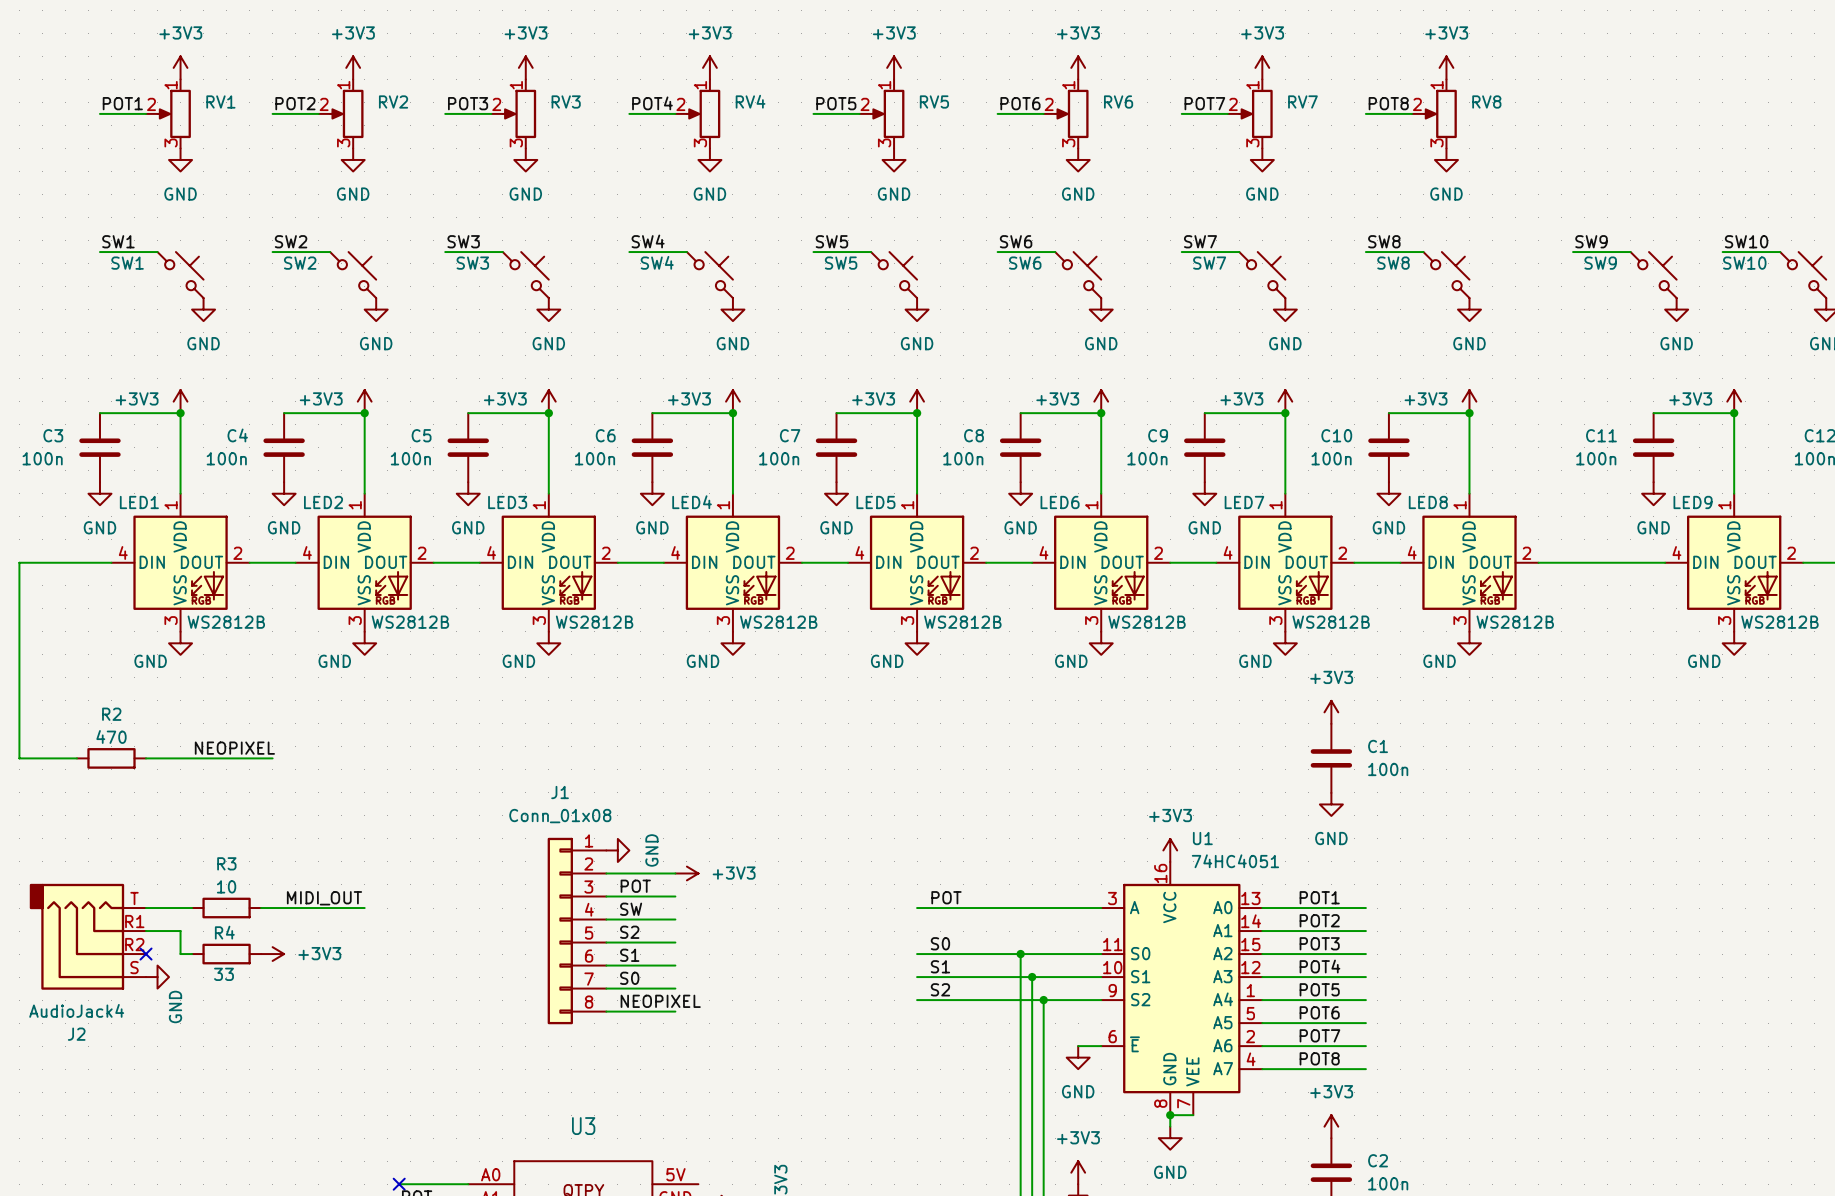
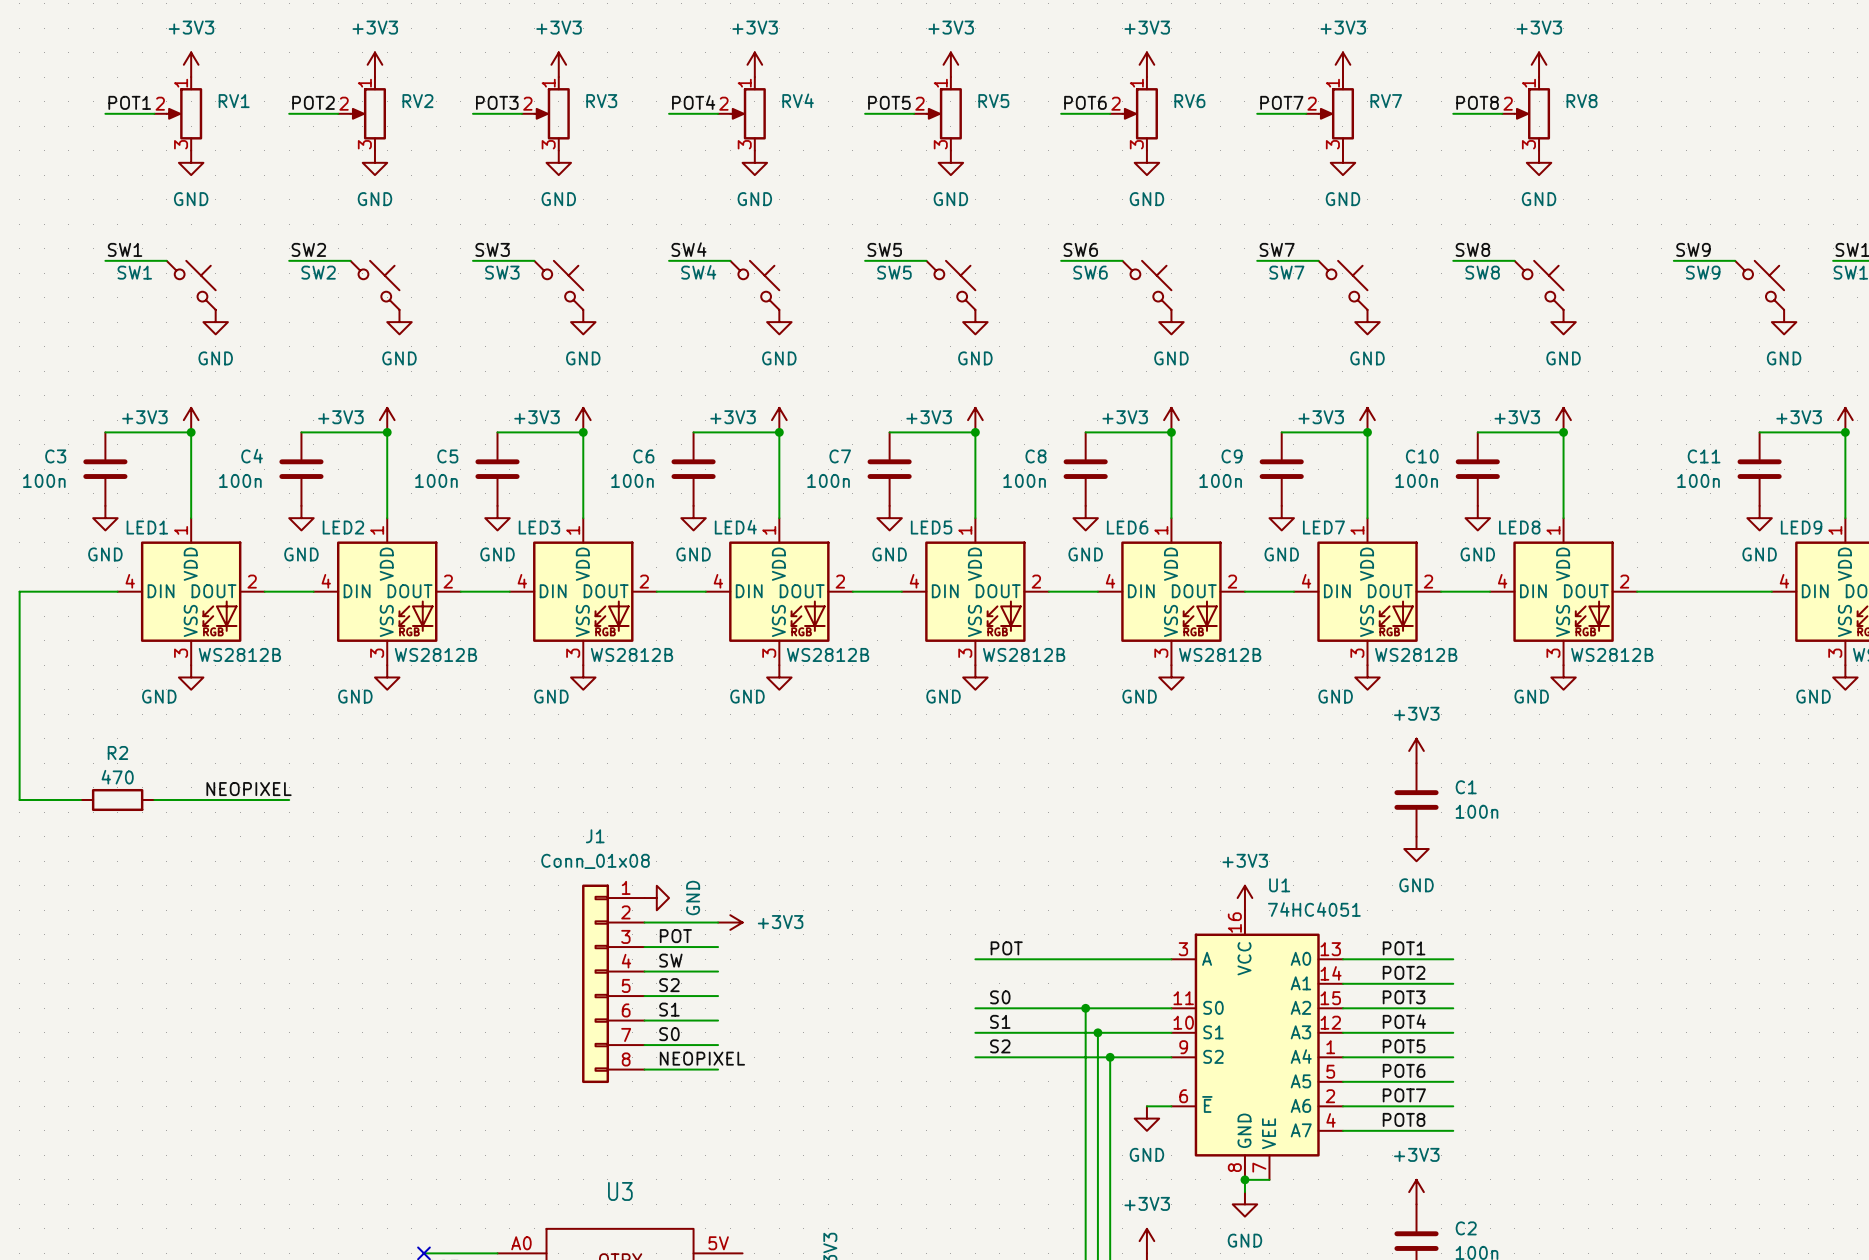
label: MIDI_OUT (324, 898) -> none
wire: (146, 908) (192, 908) -> none
R3: 10 (226, 908) -> none
wire: (261, 908) (364, 908) -> none
wire: (146, 931) (180, 931) (180, 954) (192, 954) -> none
J2: AudioJack4 (87, 936) -> none
no-connect mark: (146, 954) -> none
R4: 33 (226, 954) -> none
power symbol: +3V3 (272, 954) -> none
power symbol: GND (157, 977) -> none

